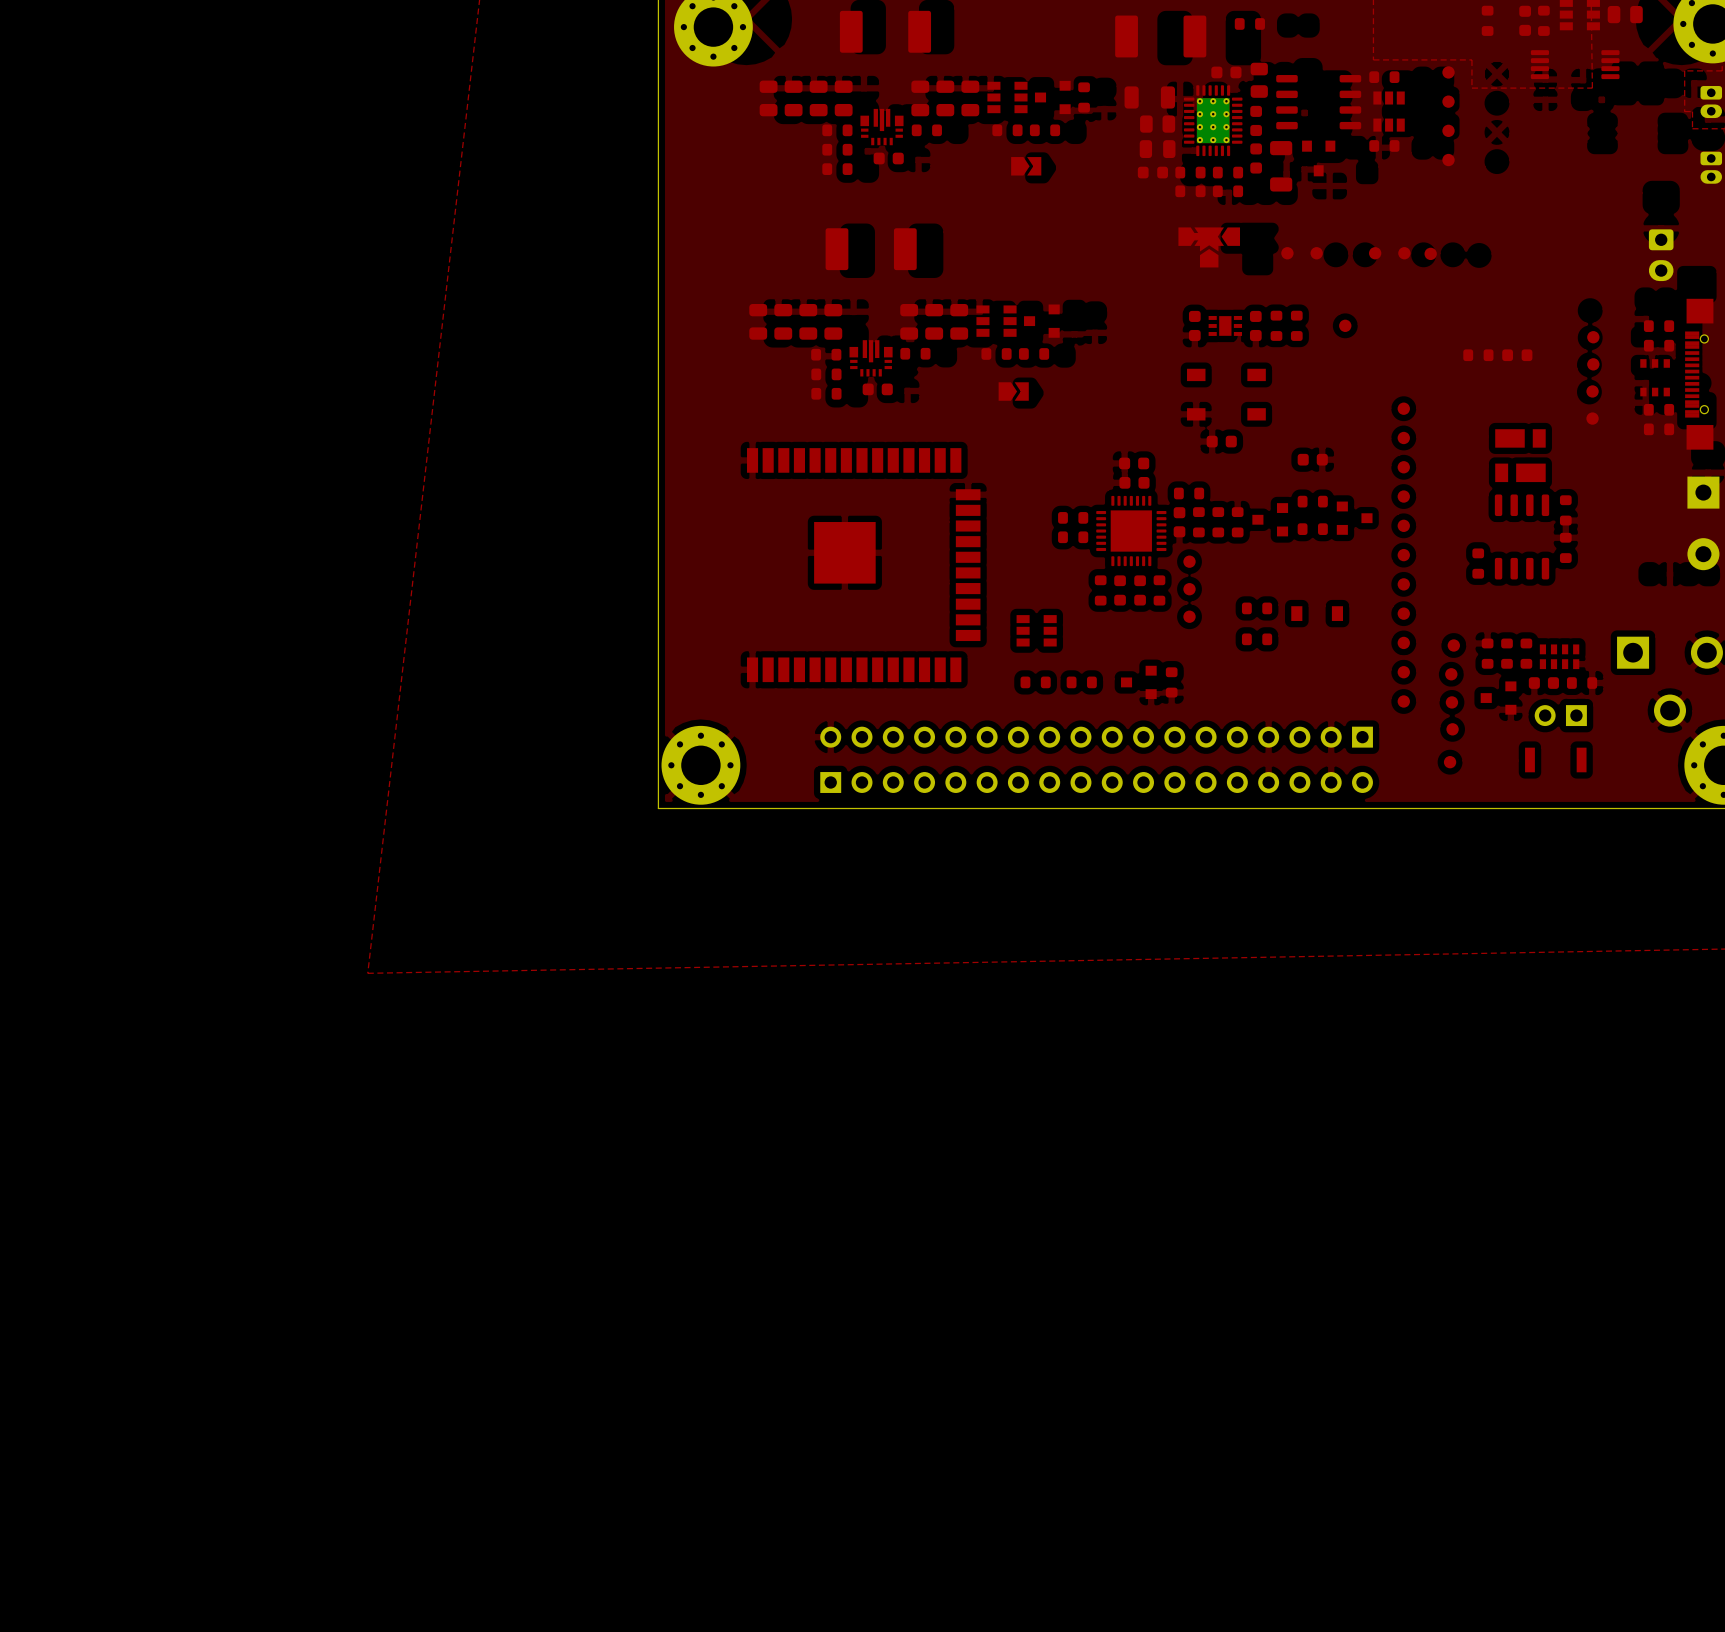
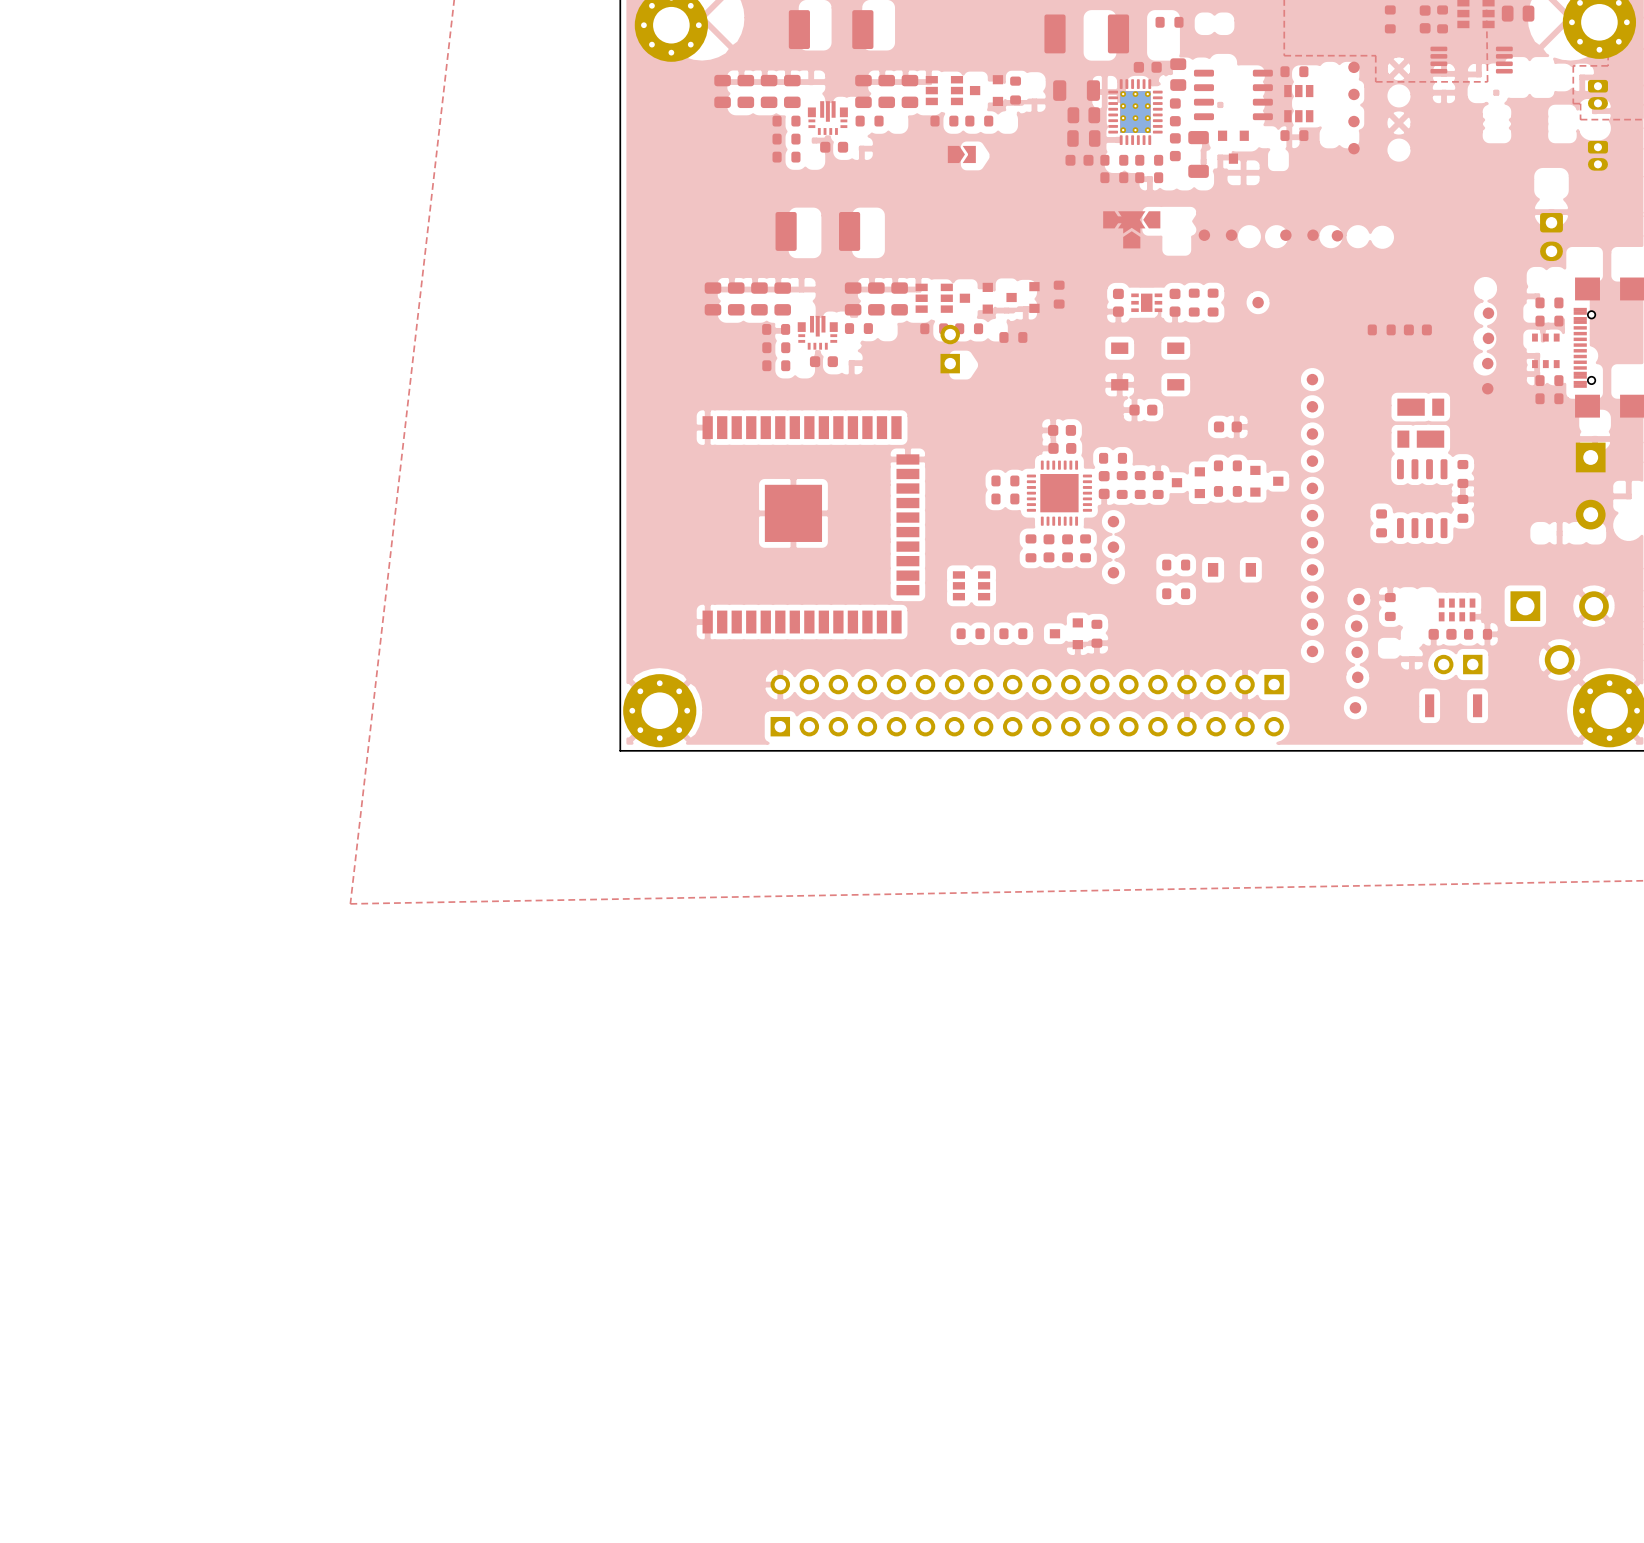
part: none -> (1059, 294)
part: none -> (1023, 297)
part: none -> (1013, 337)
part: none -> (950, 349)
part: (1013, 391) -> none
part: (1507, 653) -> none
part: (1526, 653) -> none
part: (1498, 698) -> none

